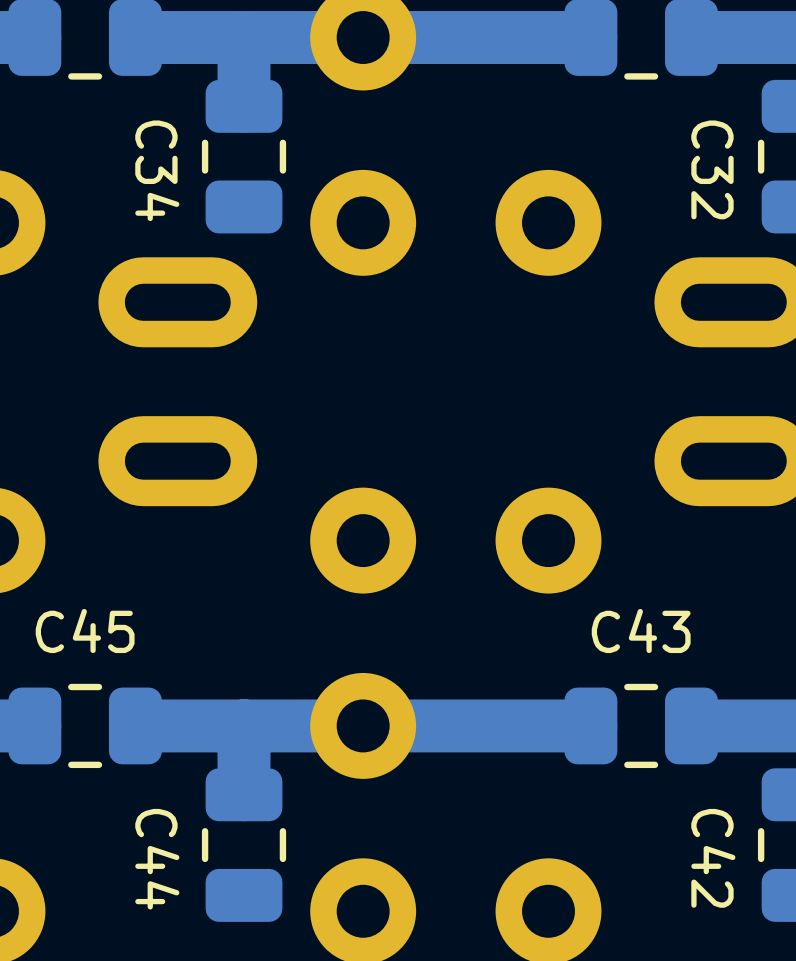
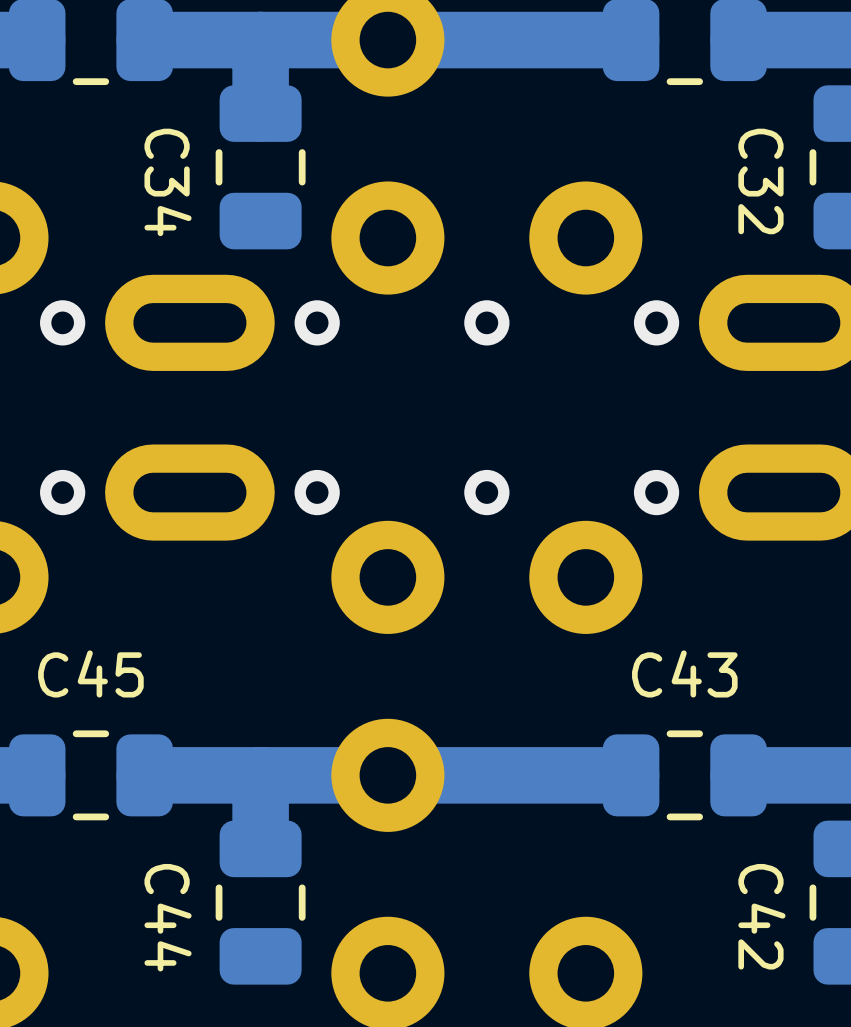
via: none -> (62, 322)
via: none -> (317, 322)
via: none -> (486, 322)
via: none -> (656, 322)
via: none -> (62, 492)
via: none -> (317, 492)
via: none -> (486, 492)
via: none -> (656, 492)

